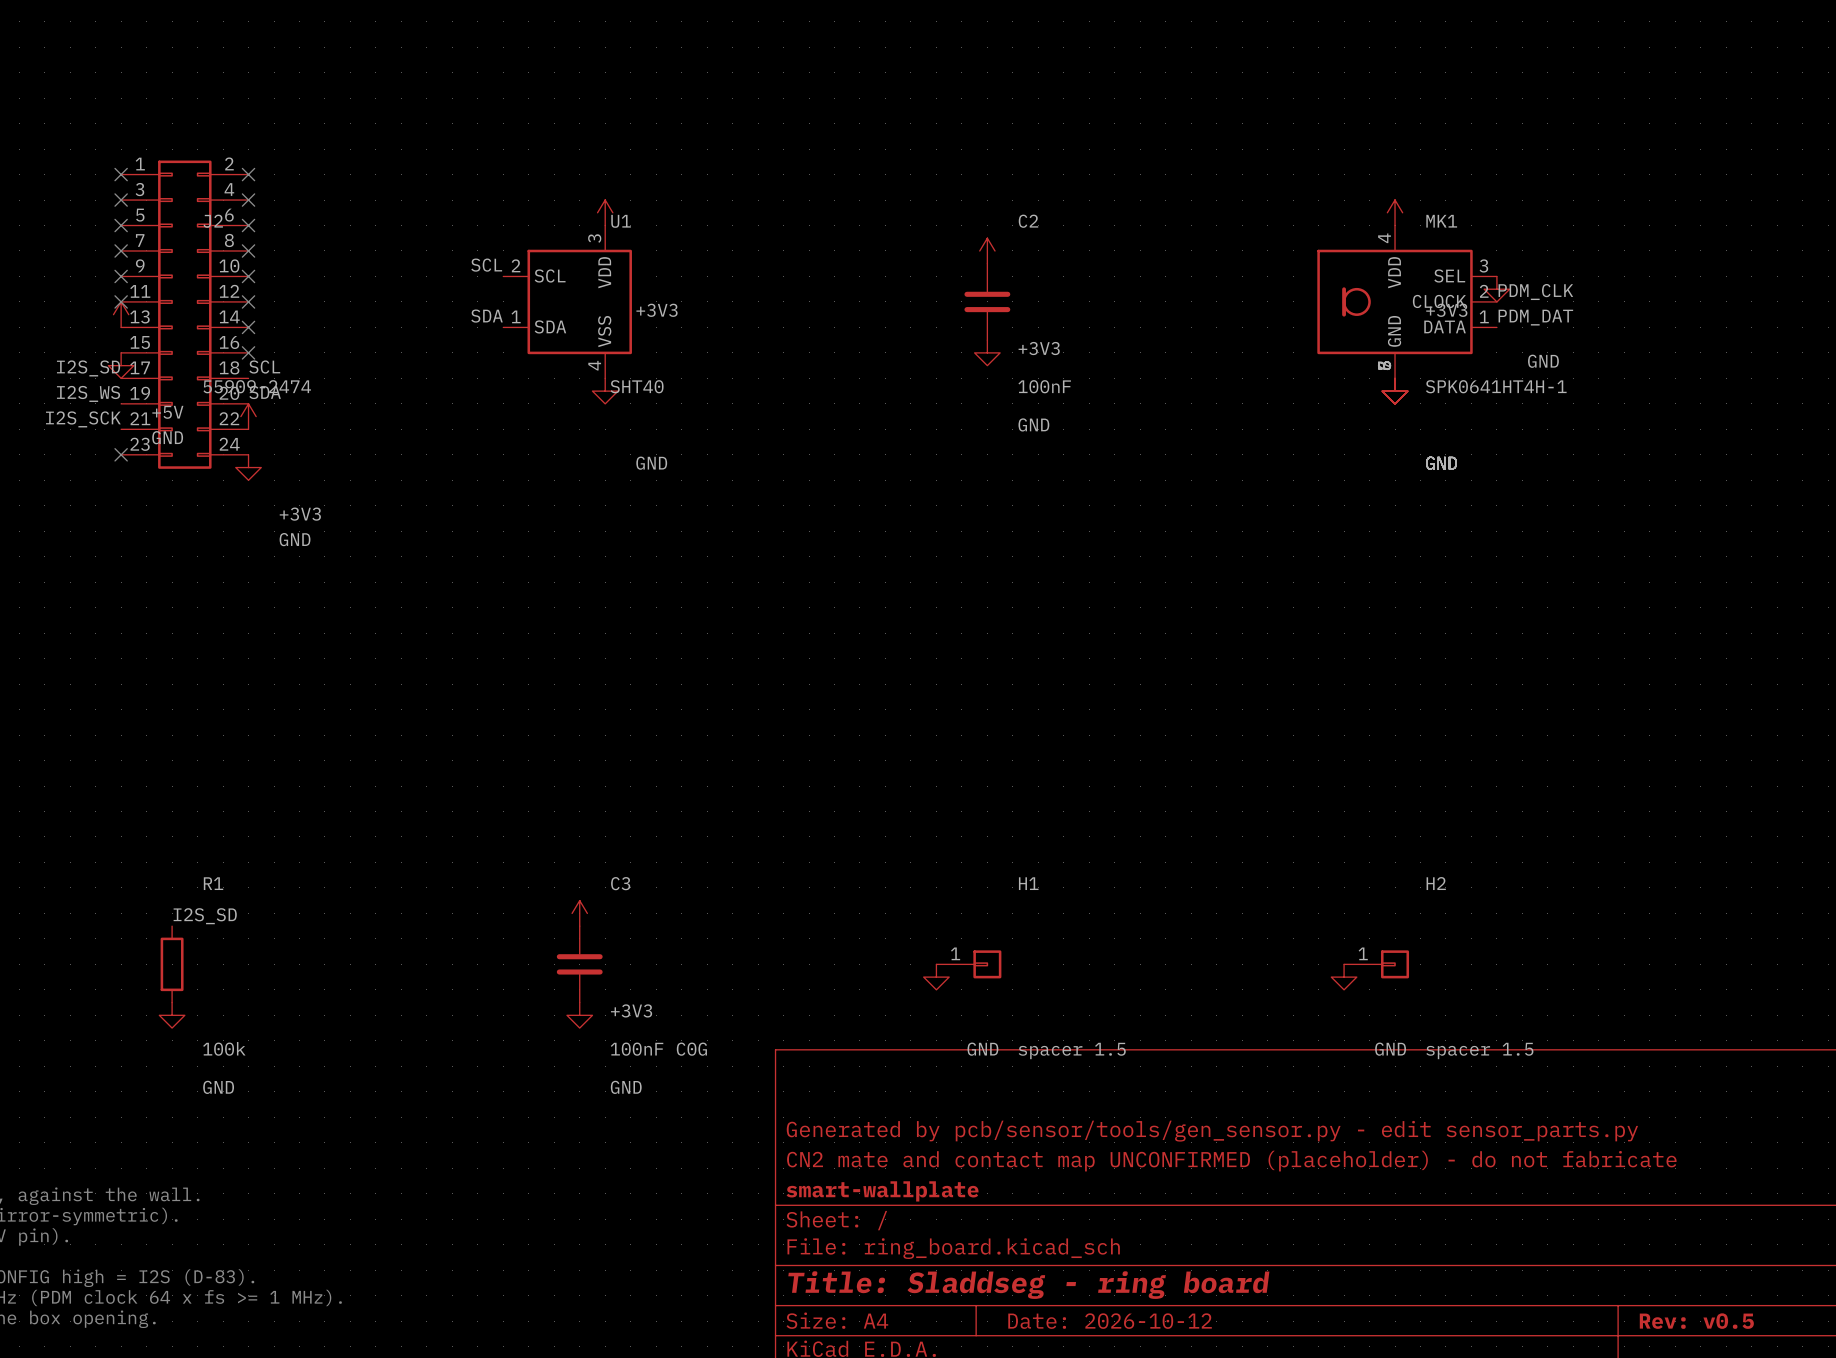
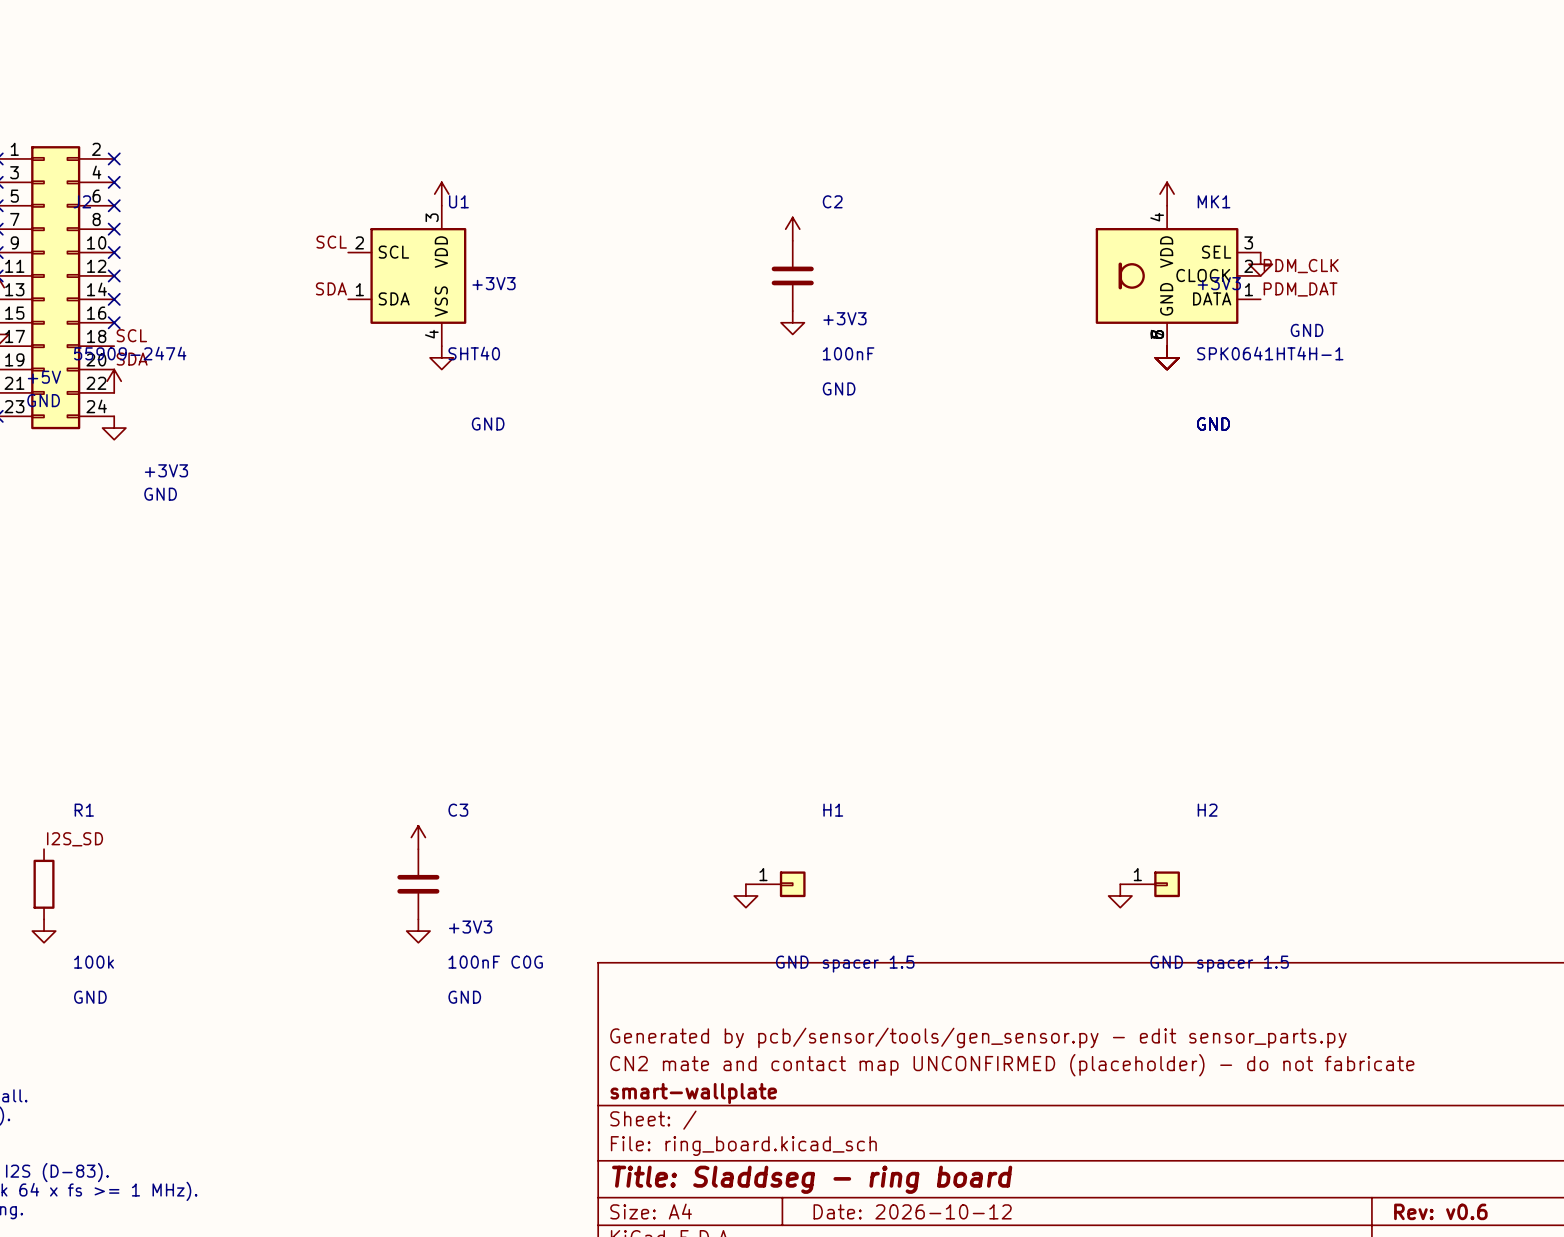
title block: Rev: v0.5 (1696, 1321) -> Rev: v0.6 (1440, 1211)

